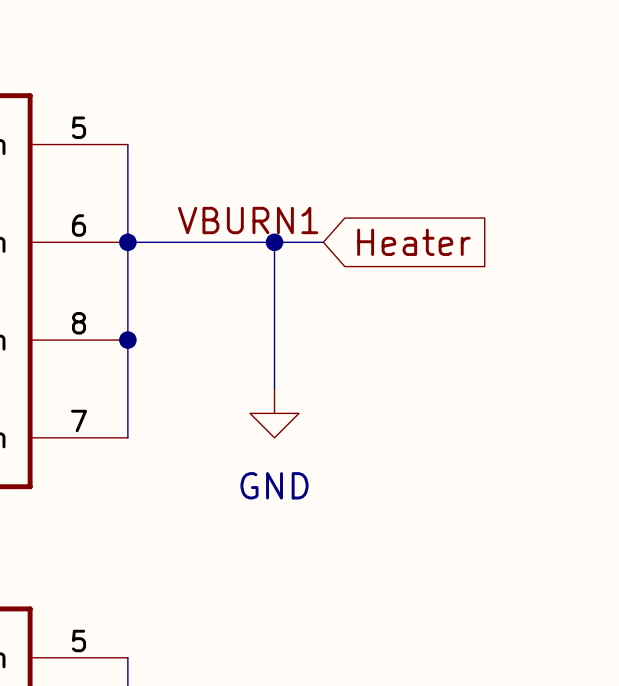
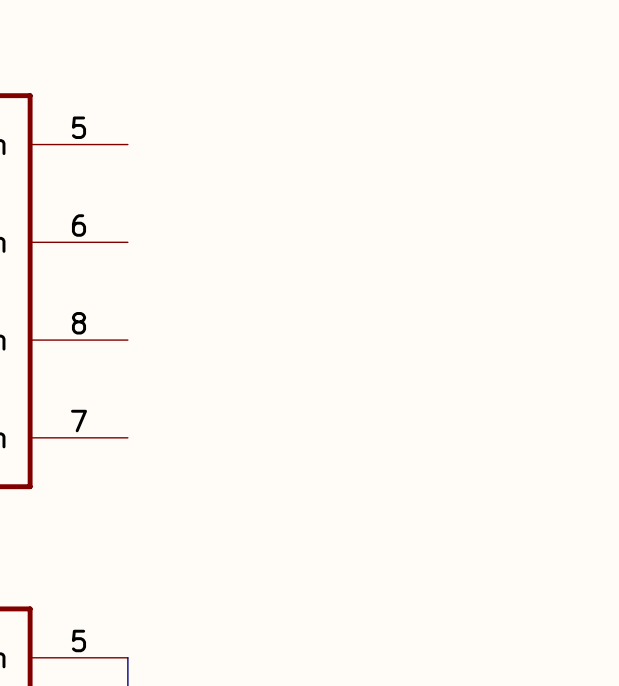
wire: (127, 144) (127, 437) -> none
label: VBURN1 (248, 220) -> none
wire: (127, 242) (323, 242) -> none
junction: (127, 242) -> none
wire: (274, 242) (274, 388) -> none
junction: (274, 242) -> none
global label: Heater (413, 242) -> none
junction: (127, 340) -> none
power symbol: GND (274, 413) -> none

